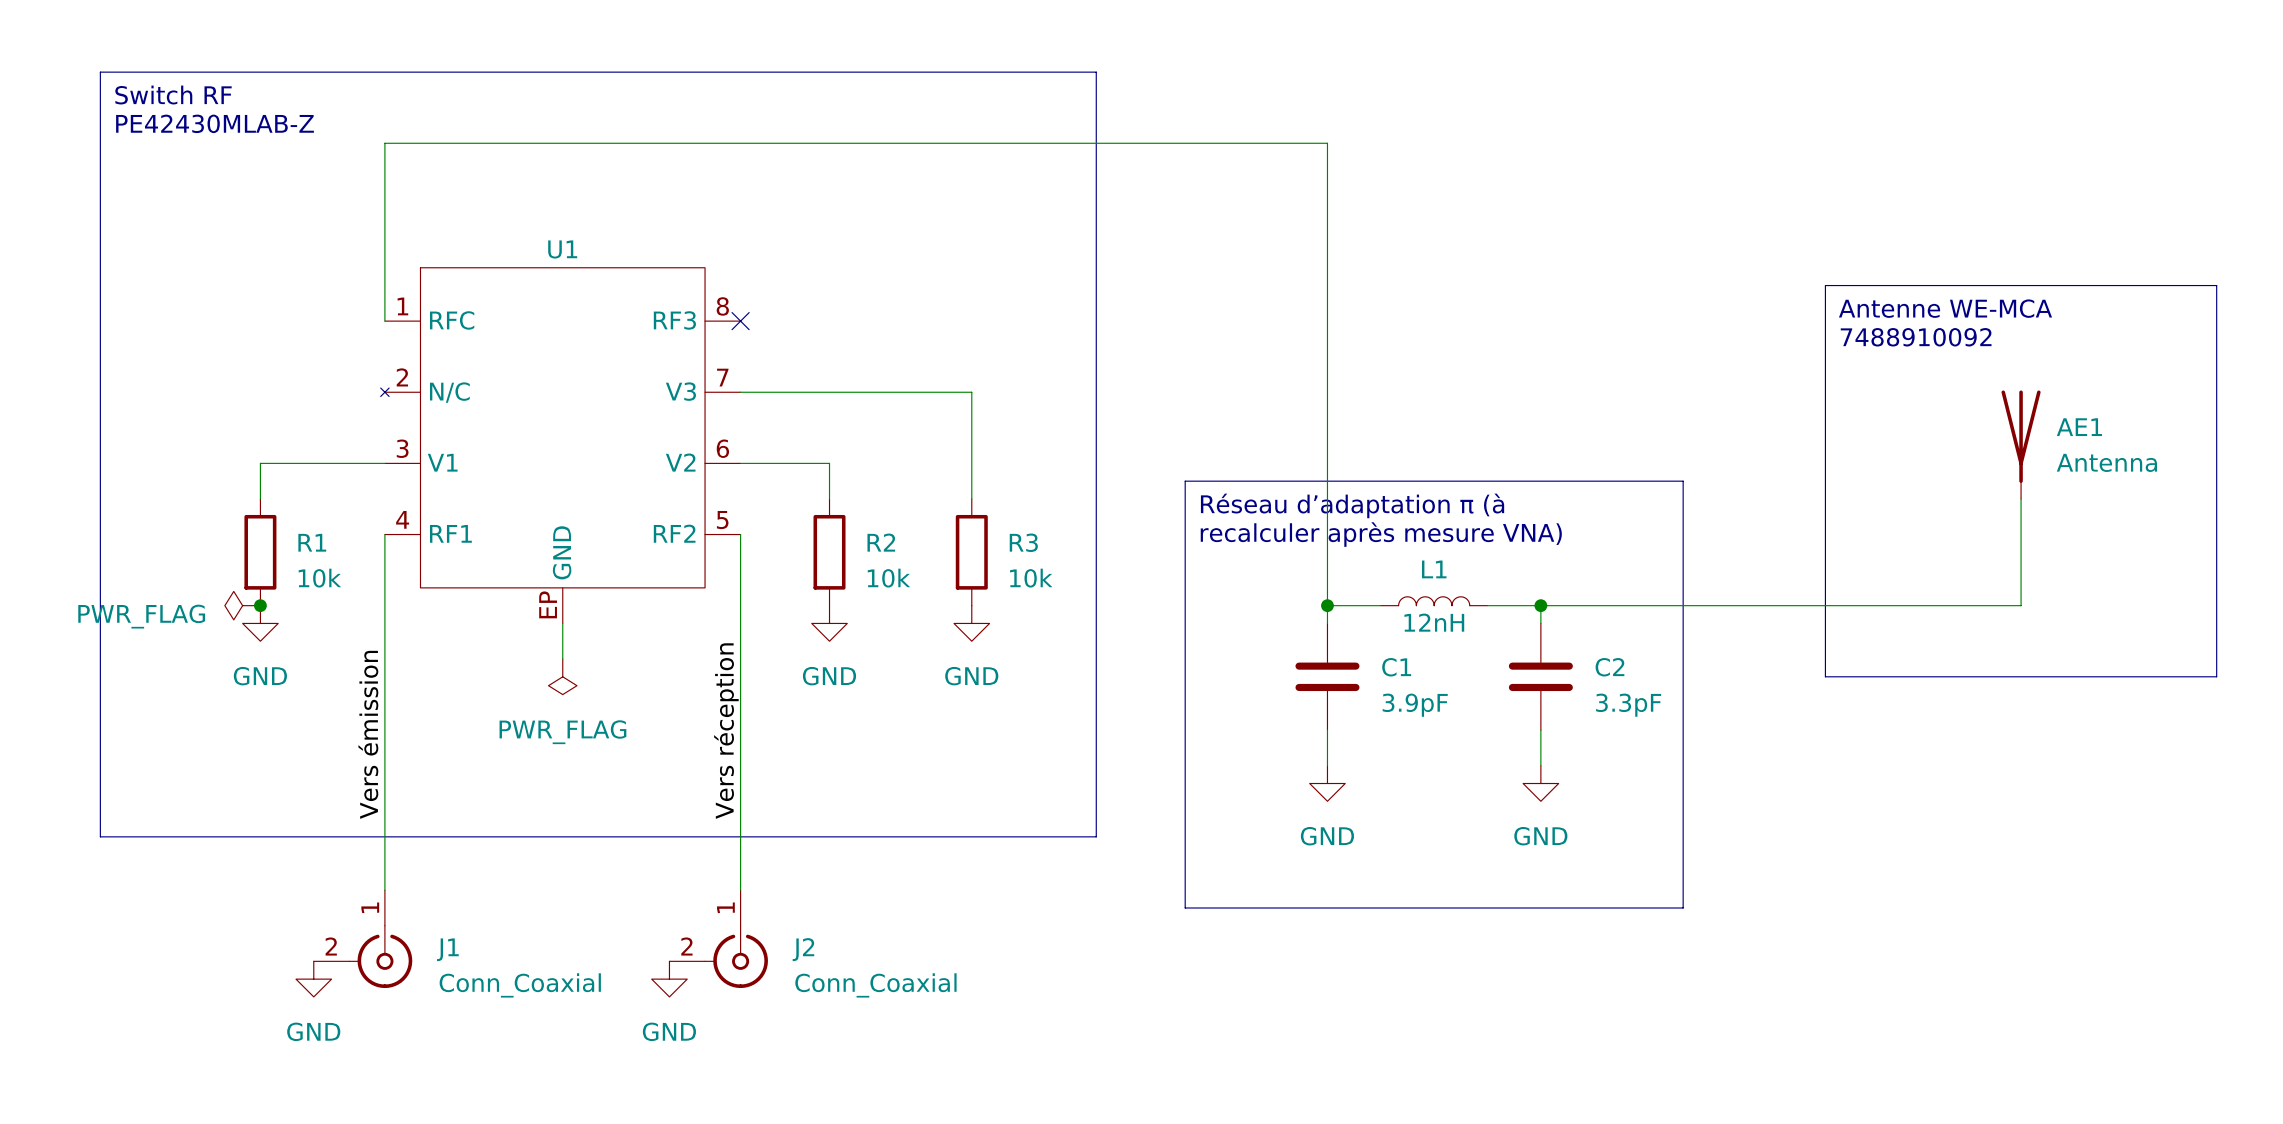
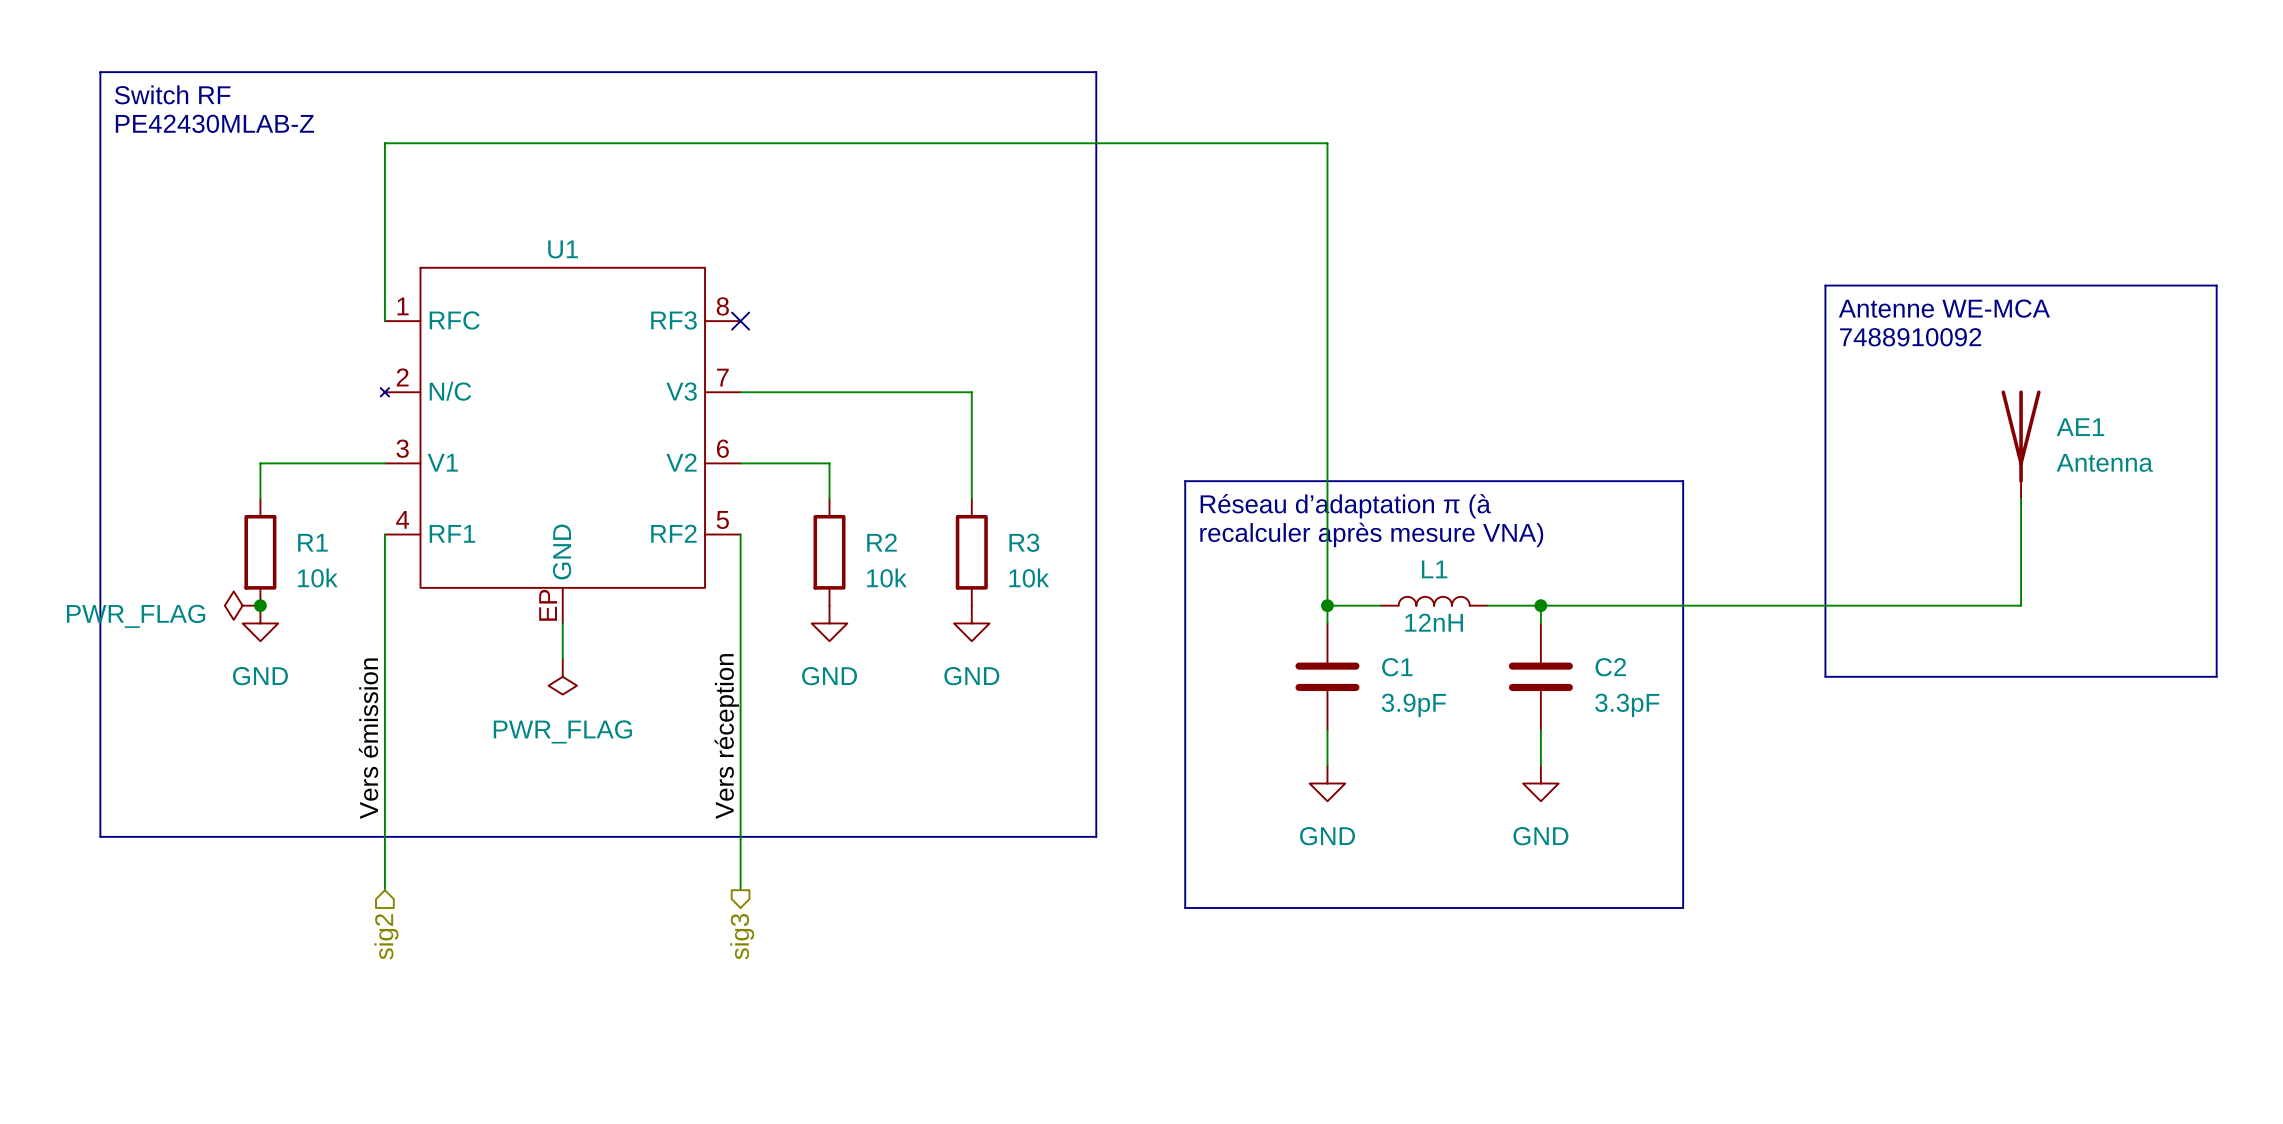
hierarchical label: none -> sig2 (386, 936)
hierarchical label: none -> sig3 (742, 936)
J1: Conn_Coaxial (363, 939) -> none
J2: Conn_Coaxial (718, 939) -> none
power symbol: GND (313, 979) -> none
power symbol: GND (669, 979) -> none

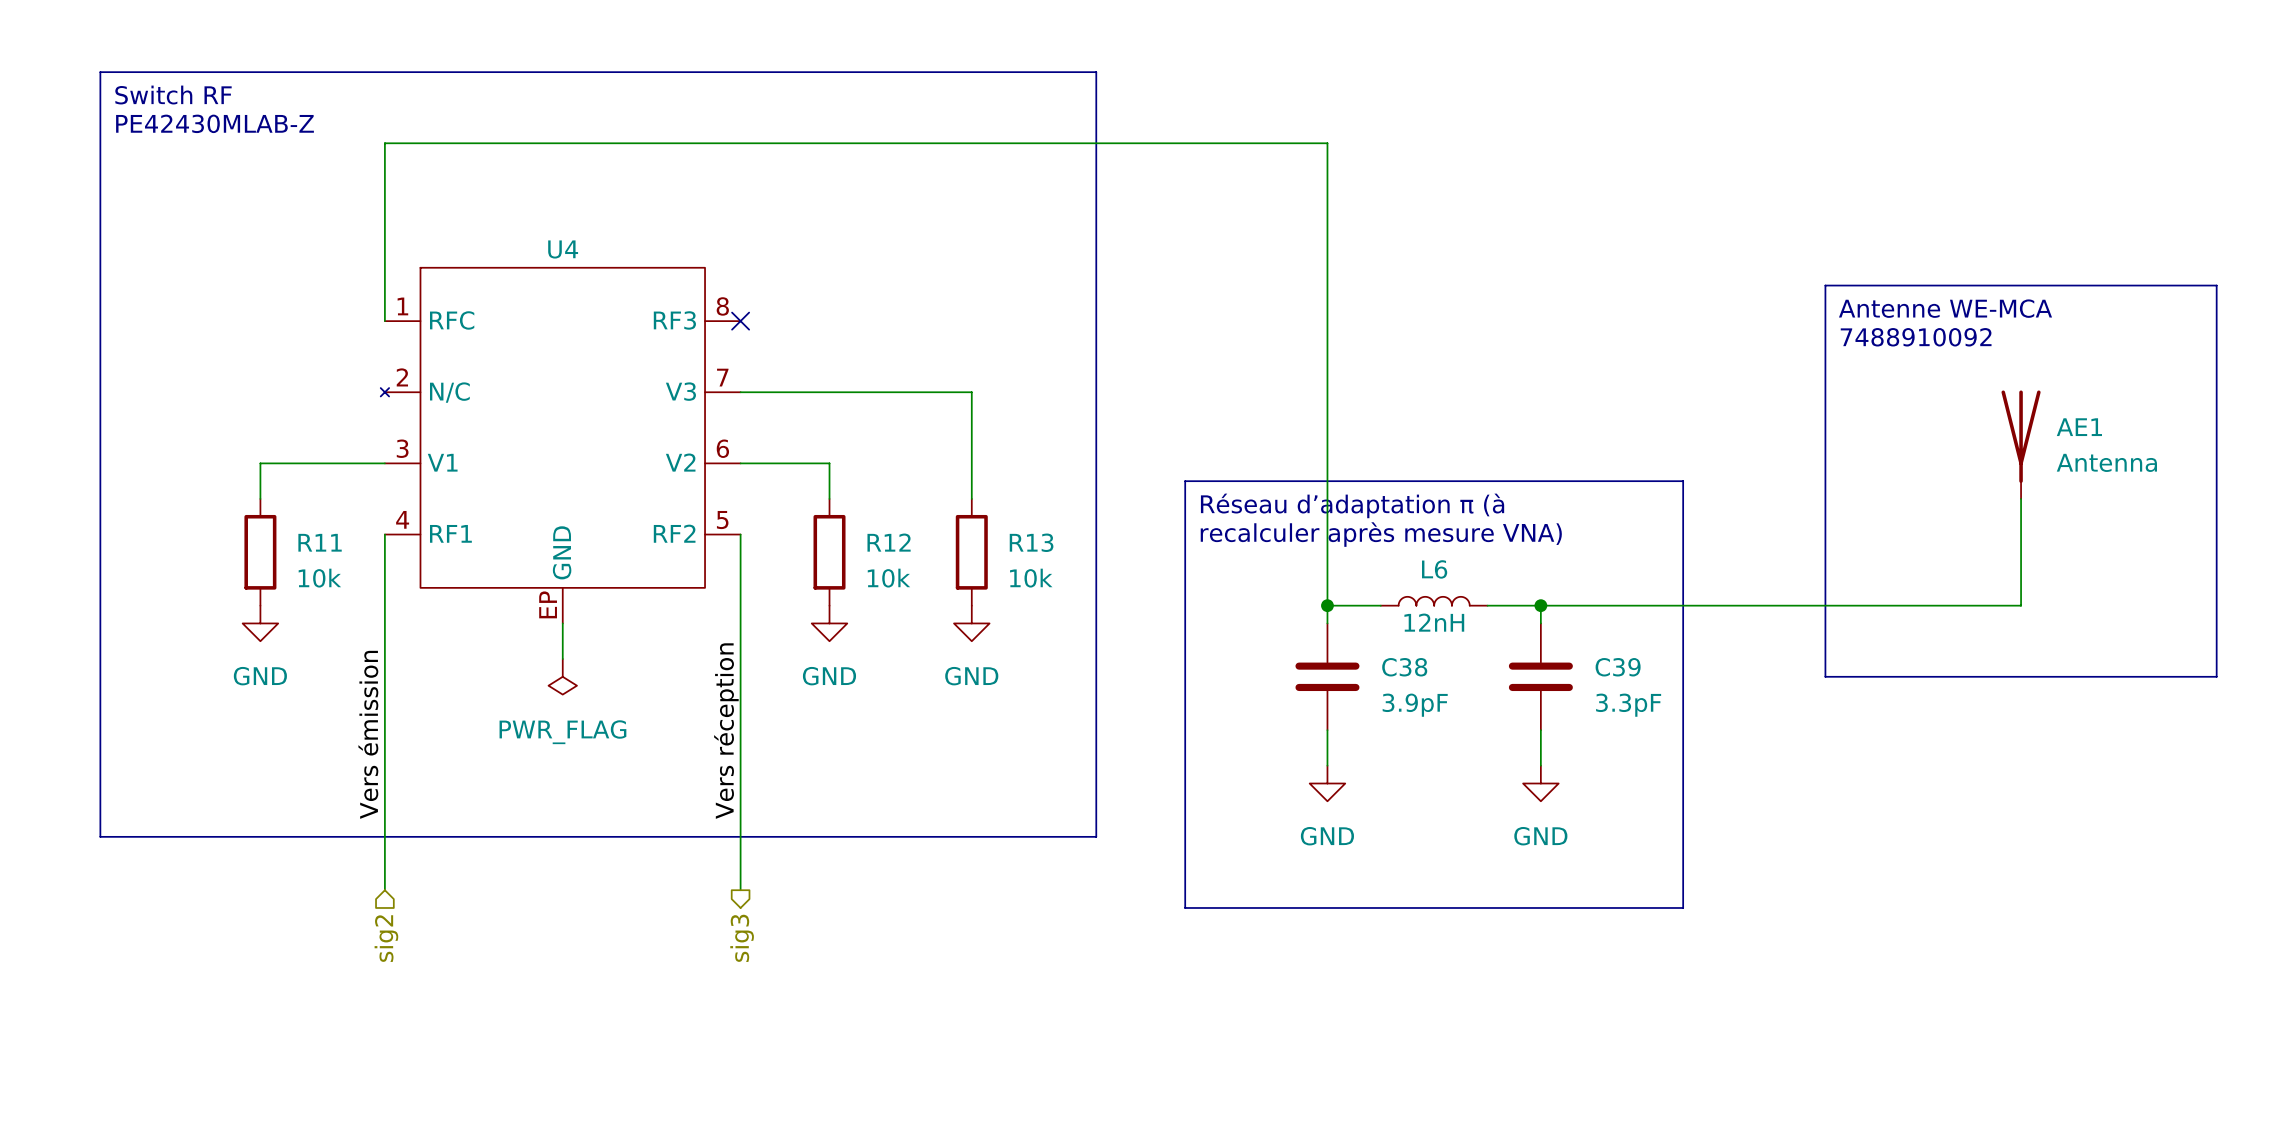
U1 name: U1 (563, 249) -> U4 (563, 249)
R1 name: R1 (312, 542) -> R11 (320, 542)
R2 name: R2 (882, 542) -> R12 (889, 542)
R3 name: R3 (1024, 542) -> R13 (1031, 542)
L1 name: L1 (1434, 569) -> L6 (1434, 569)
power symbol: PWR_FLAG (242, 605) -> none
junction: (260, 605) -> none
C1 name: C1 (1397, 667) -> C38 (1404, 667)
C2 name: C2 (1610, 667) -> C39 (1618, 667)

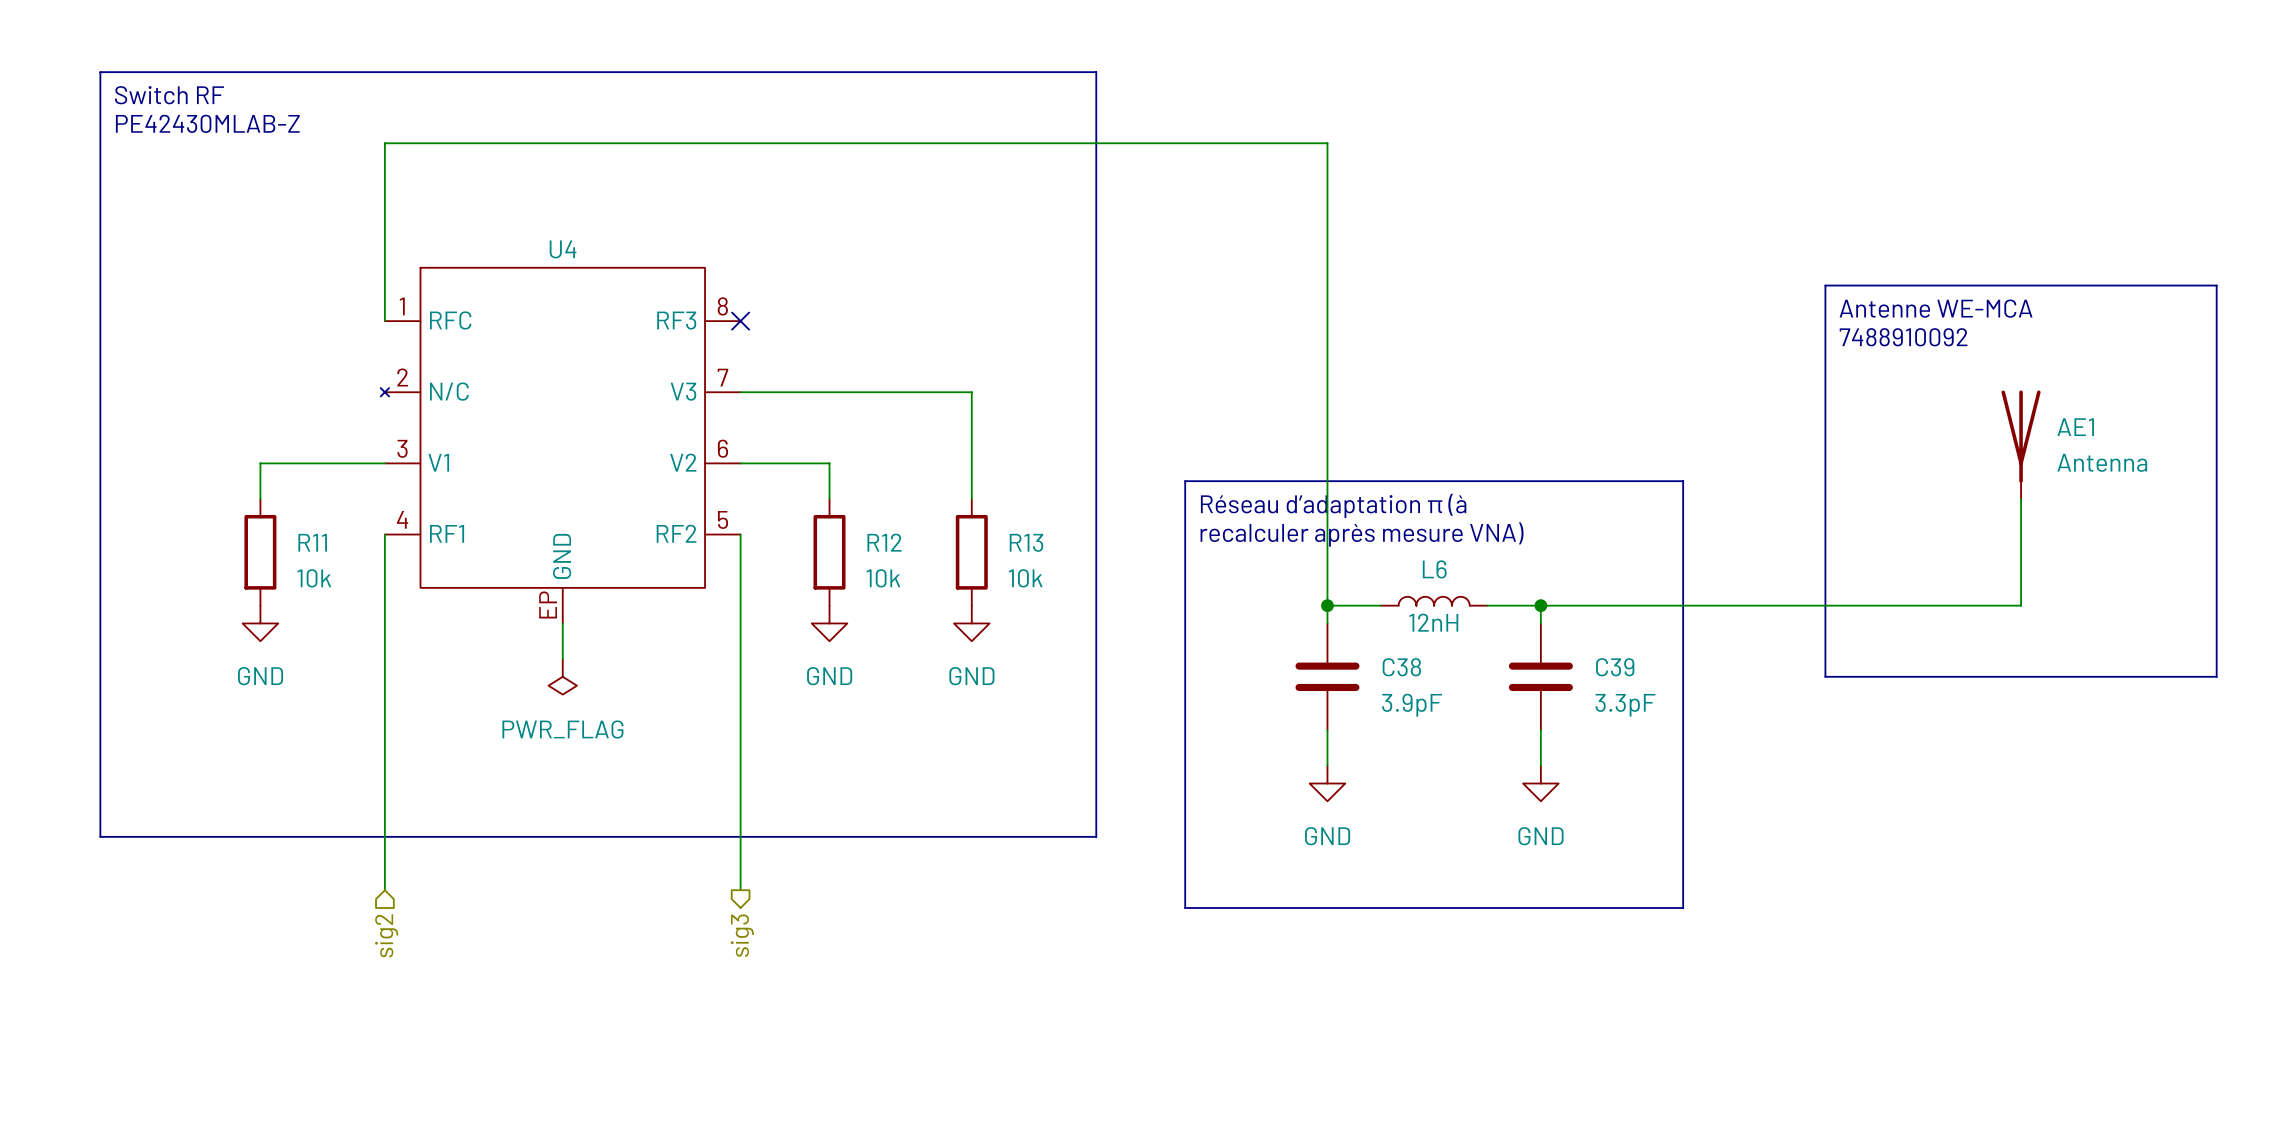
label: Vers réception (726, 731) -> none
label: Vers émission (368, 734) -> none

